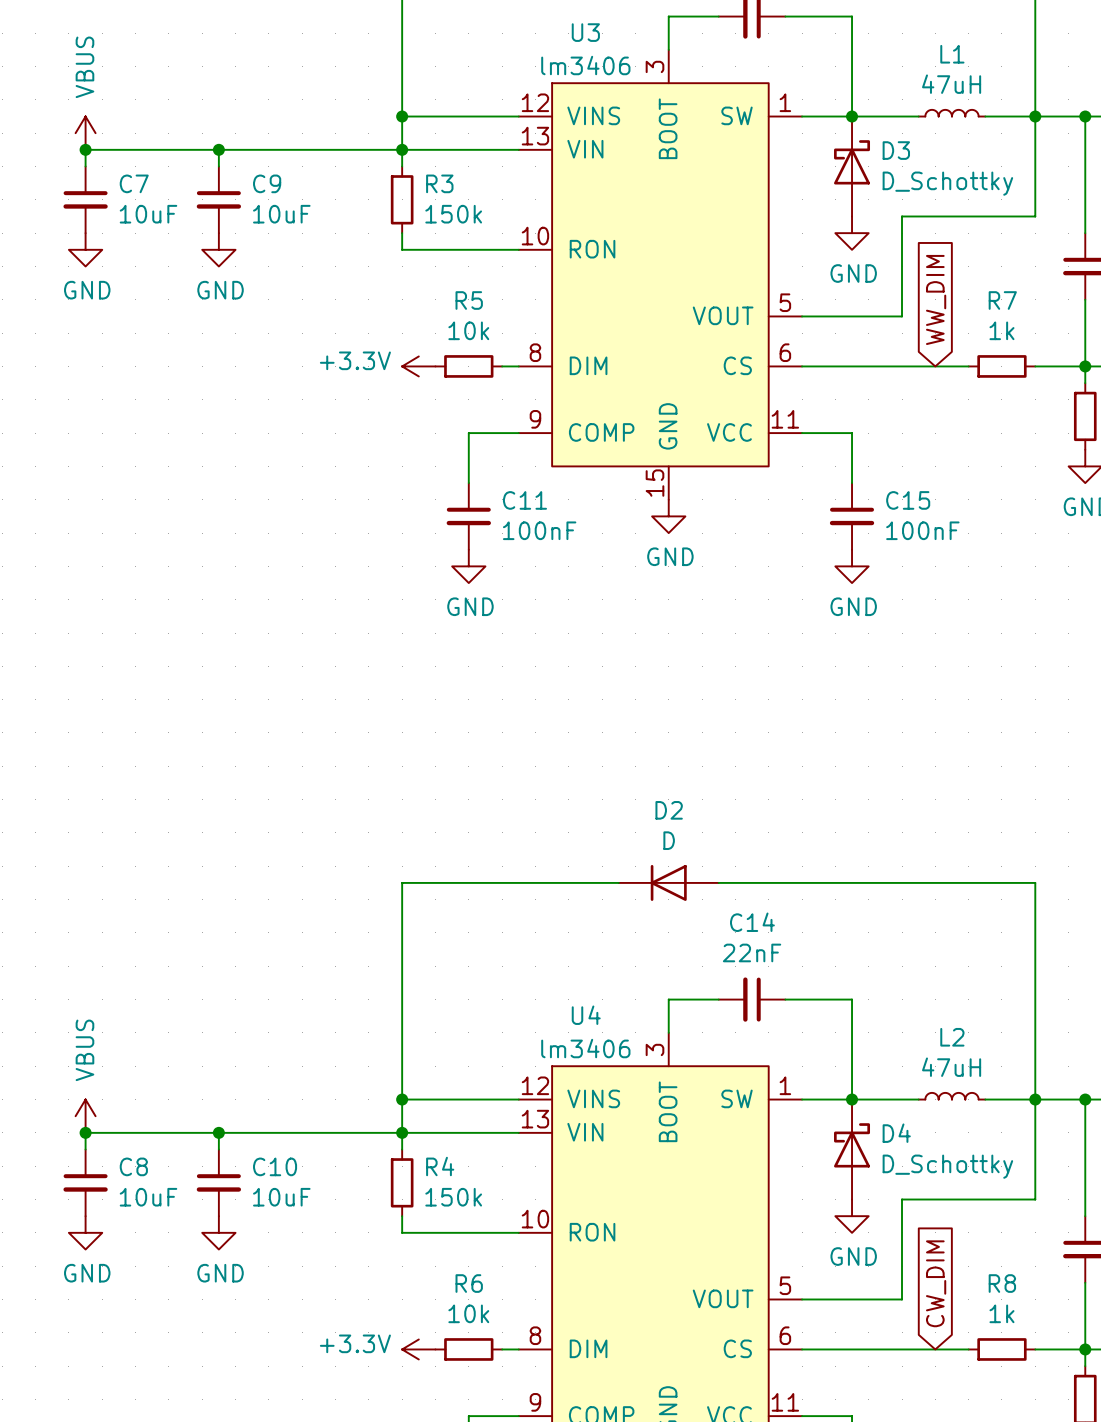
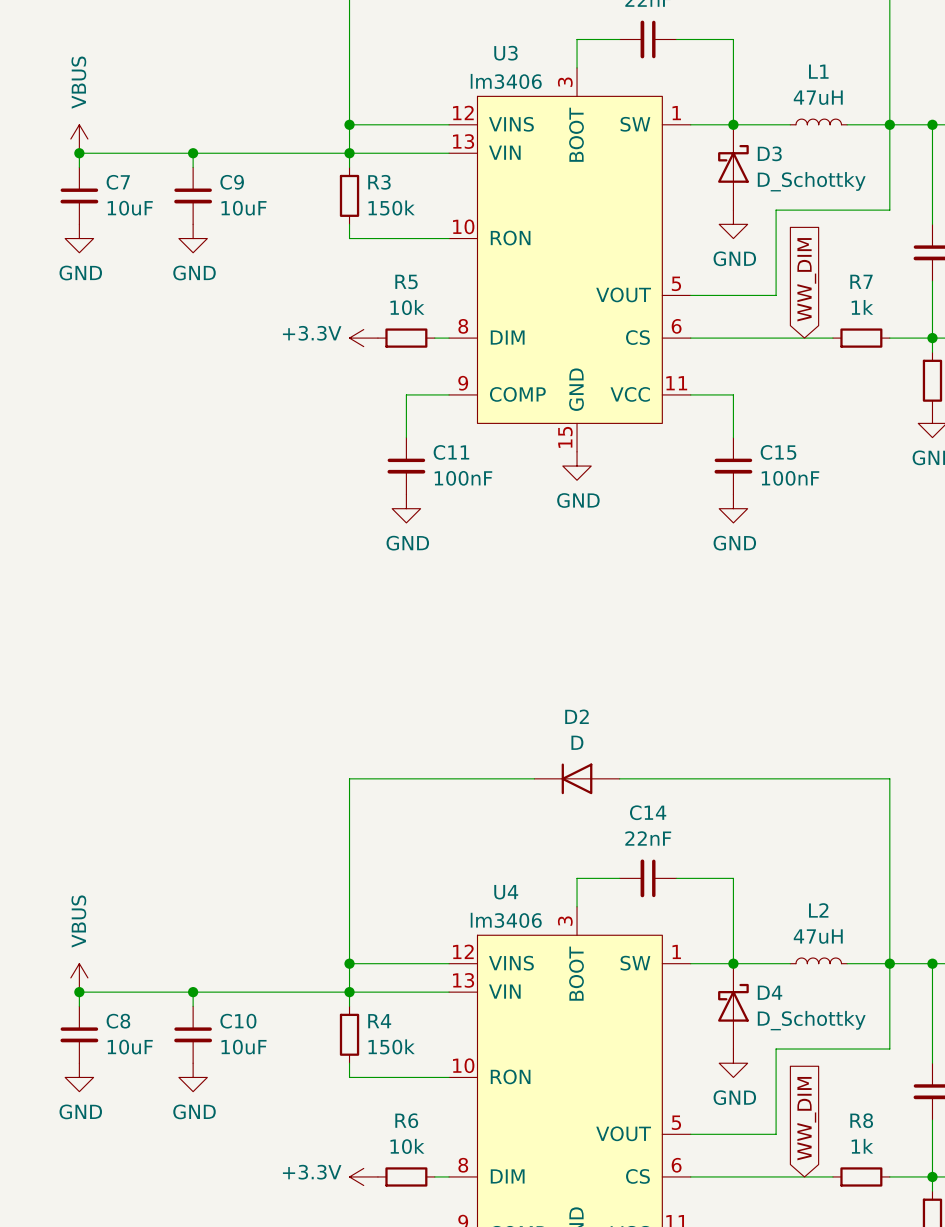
global label: CW_DIM (936, 1283) -> WW_DIM (806, 1118)

